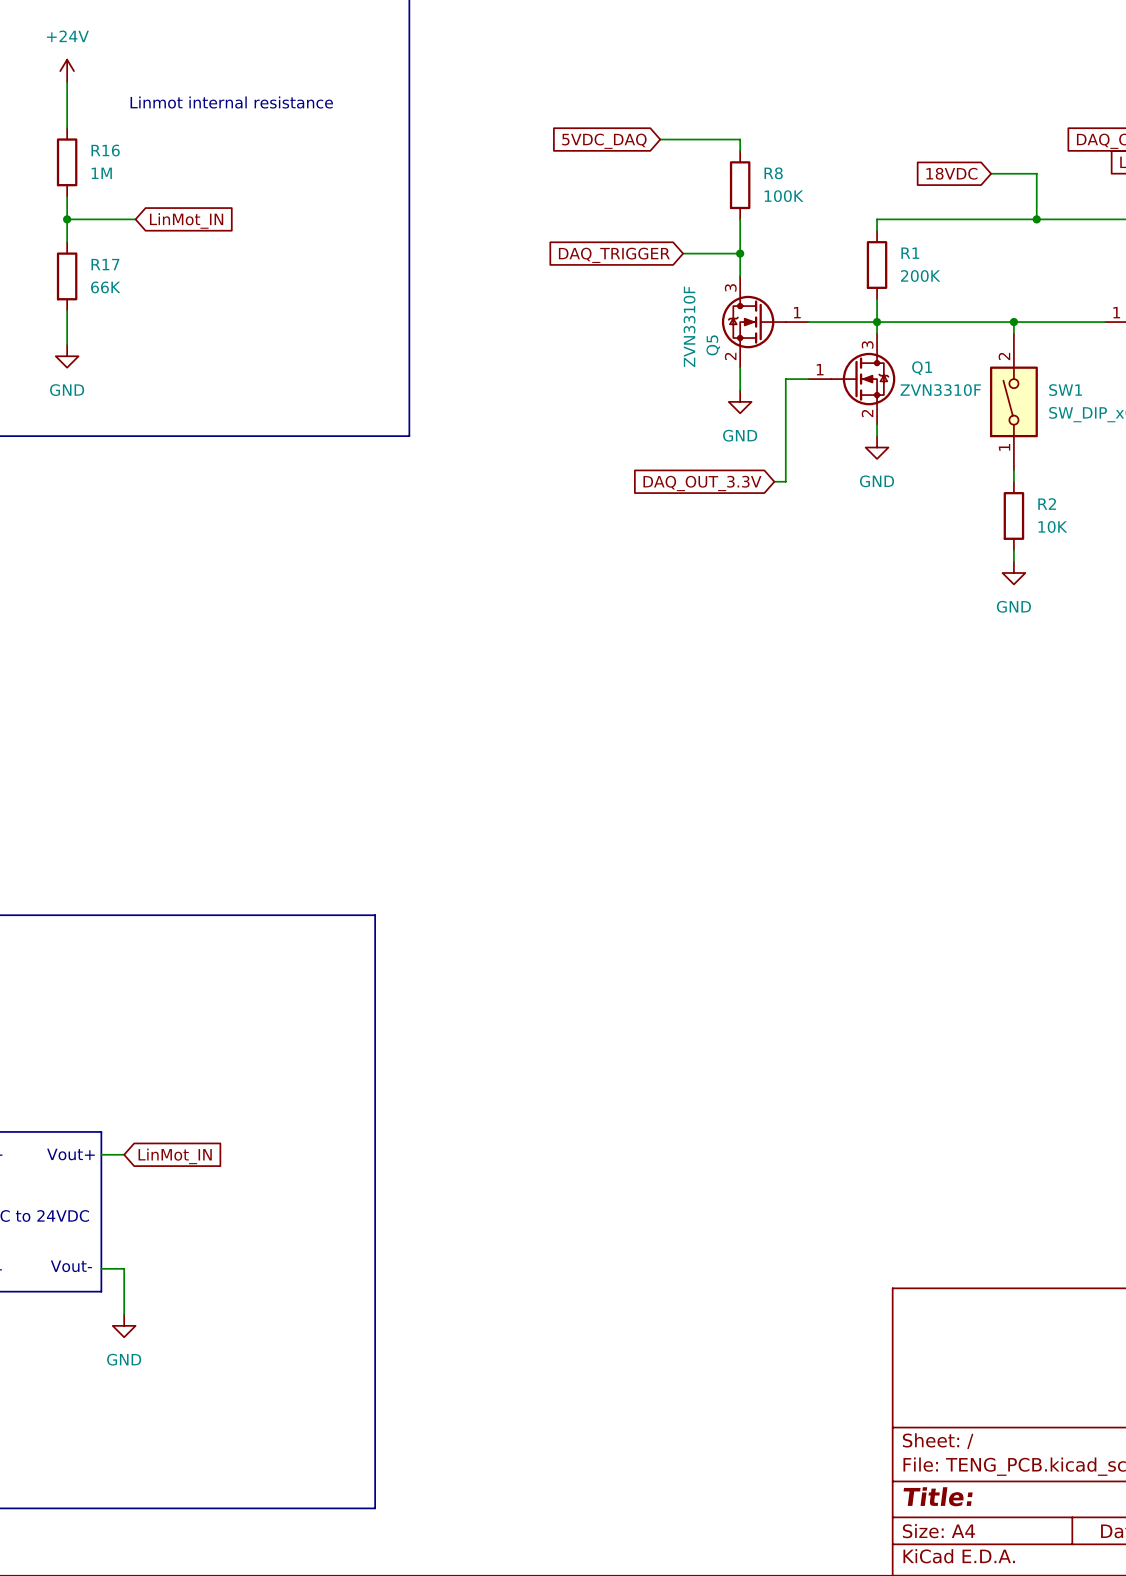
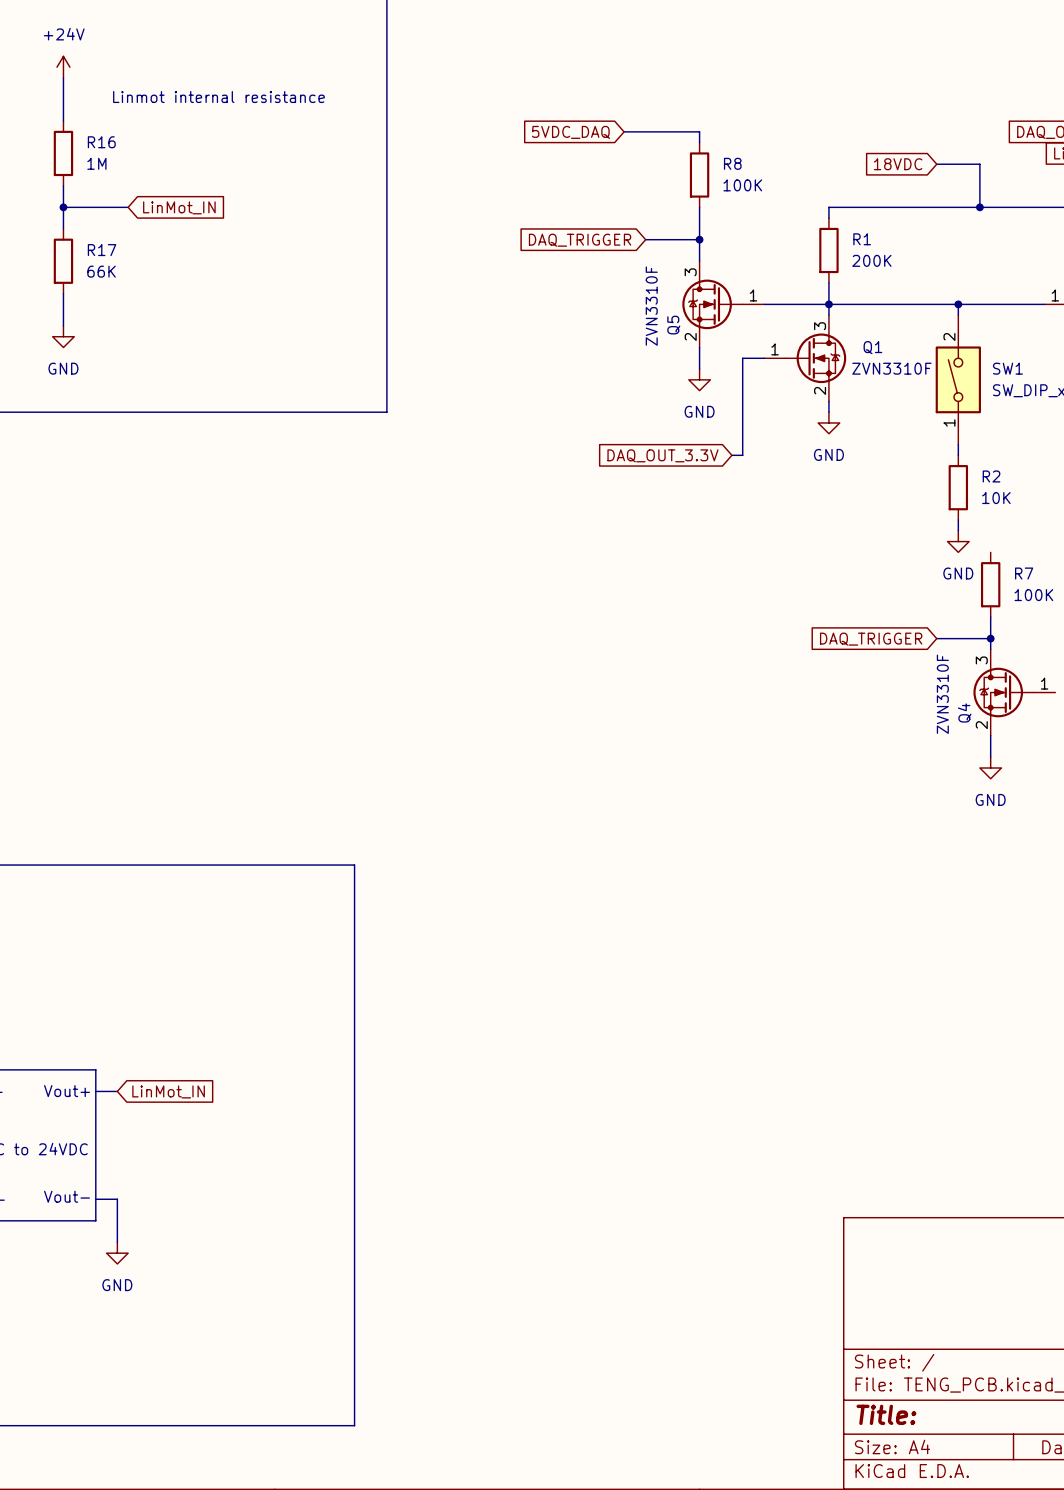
R7: none -> 100K (990, 584)
wire: none -> (990, 617) (990, 649)
wire: none -> (936, 638) (990, 638)
junction: none -> (990, 638)
global label: none -> DAQ_TRIGGER (871, 639)
Q4: none -> ZVN3310F (1014, 692)
wire: none -> (990, 735) (990, 757)
power symbol: none -> GND (990, 768)

